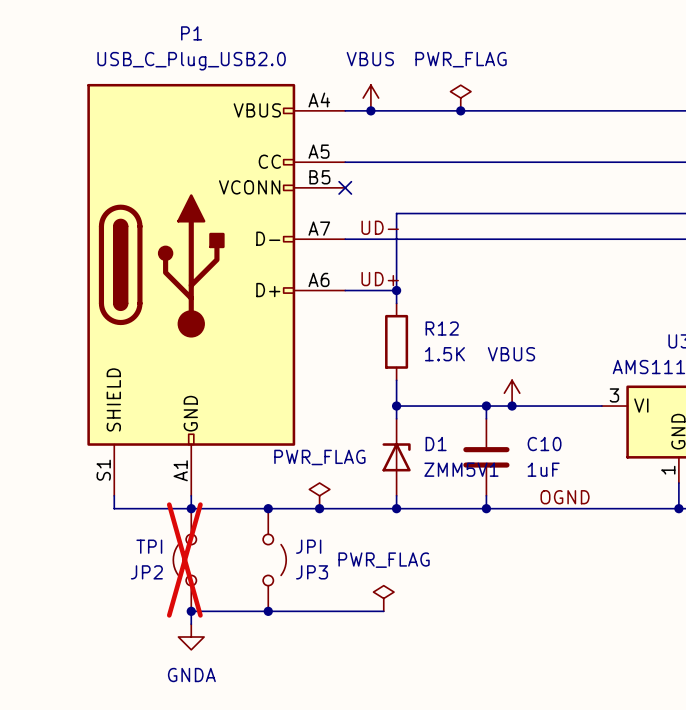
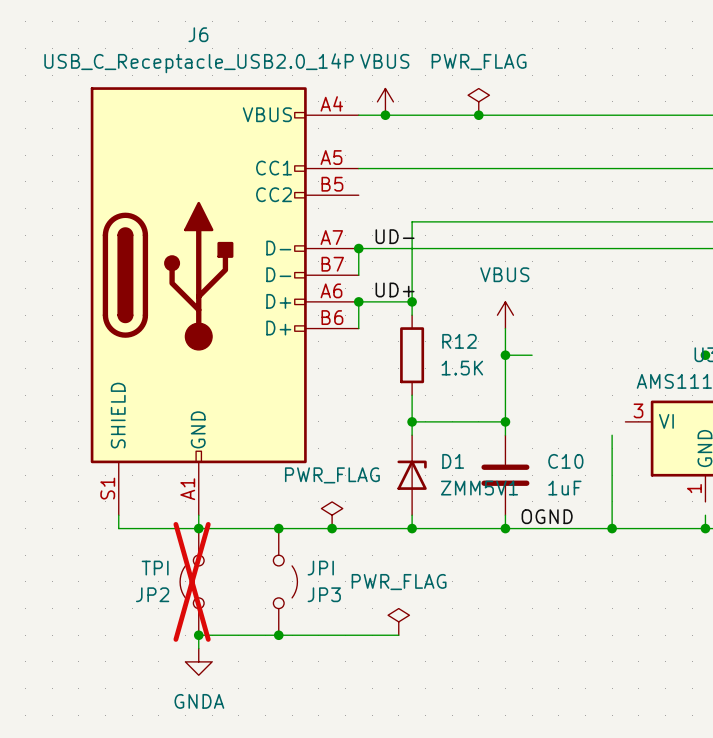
no-connect mark: (345, 187) -> none
wire: none -> (358, 248) (358, 275)
junction: none -> (358, 248)
P1: USB_C_Plug_USB2.0 (216, 289) -> none
J6: none -> USB_C_Receptacle_USB2.0_14P (224, 301)
wire: none -> (358, 301) (358, 328)
junction: none -> (358, 301)
wire: none -> (505, 355) (532, 355)
junction: none -> (505, 355)
junction: none -> (705, 355)
power symbol position: VBUS (512, 393) -> VBUS (505, 315)
wire: (486, 406) (601, 406) -> (505, 421) (505, 328)
junction: (512, 406) -> none
wire: none -> (612, 435) (612, 528)
wire: (678, 483) (678, 495) -> none
label position: OGND (565, 497) -> OGND (547, 516)
junction: none -> (612, 528)

